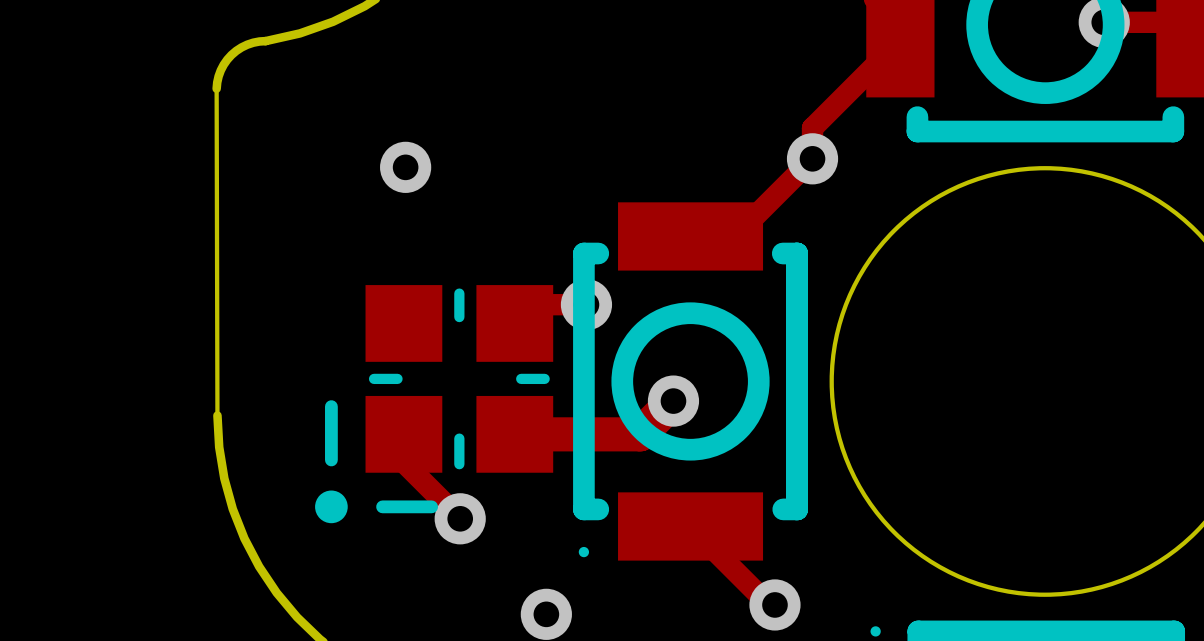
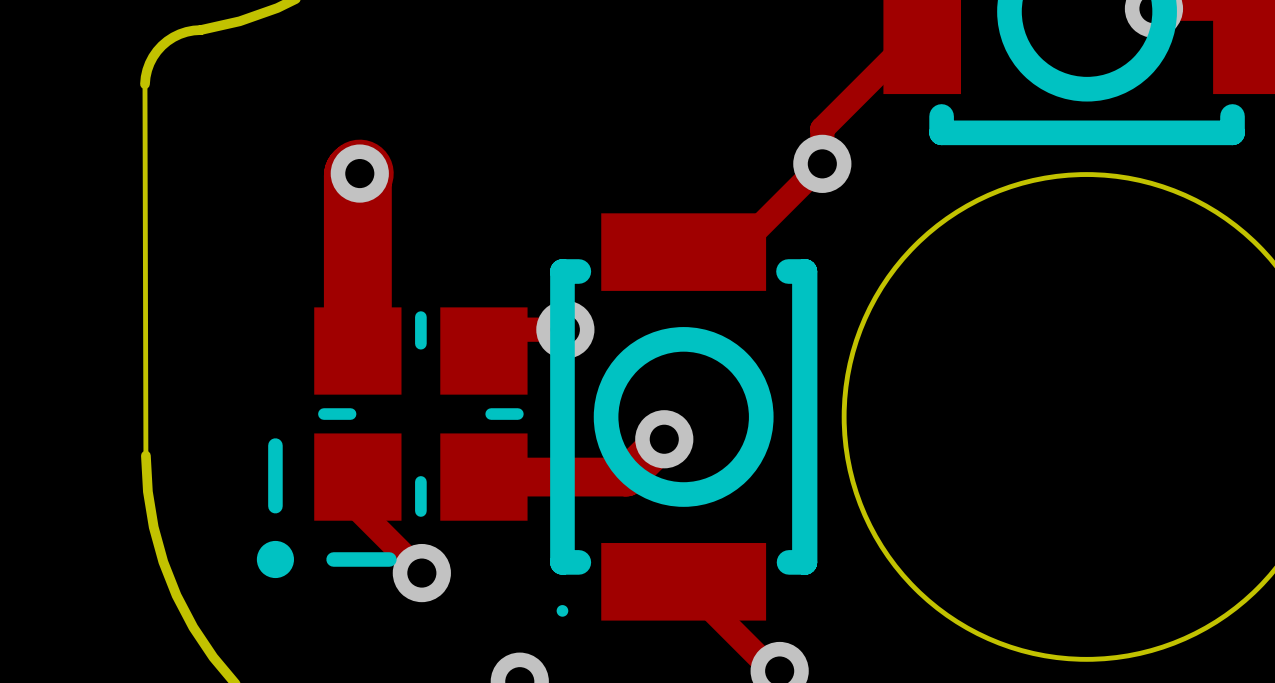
track: none -> (359, 173) (357, 175) (357, 351)

